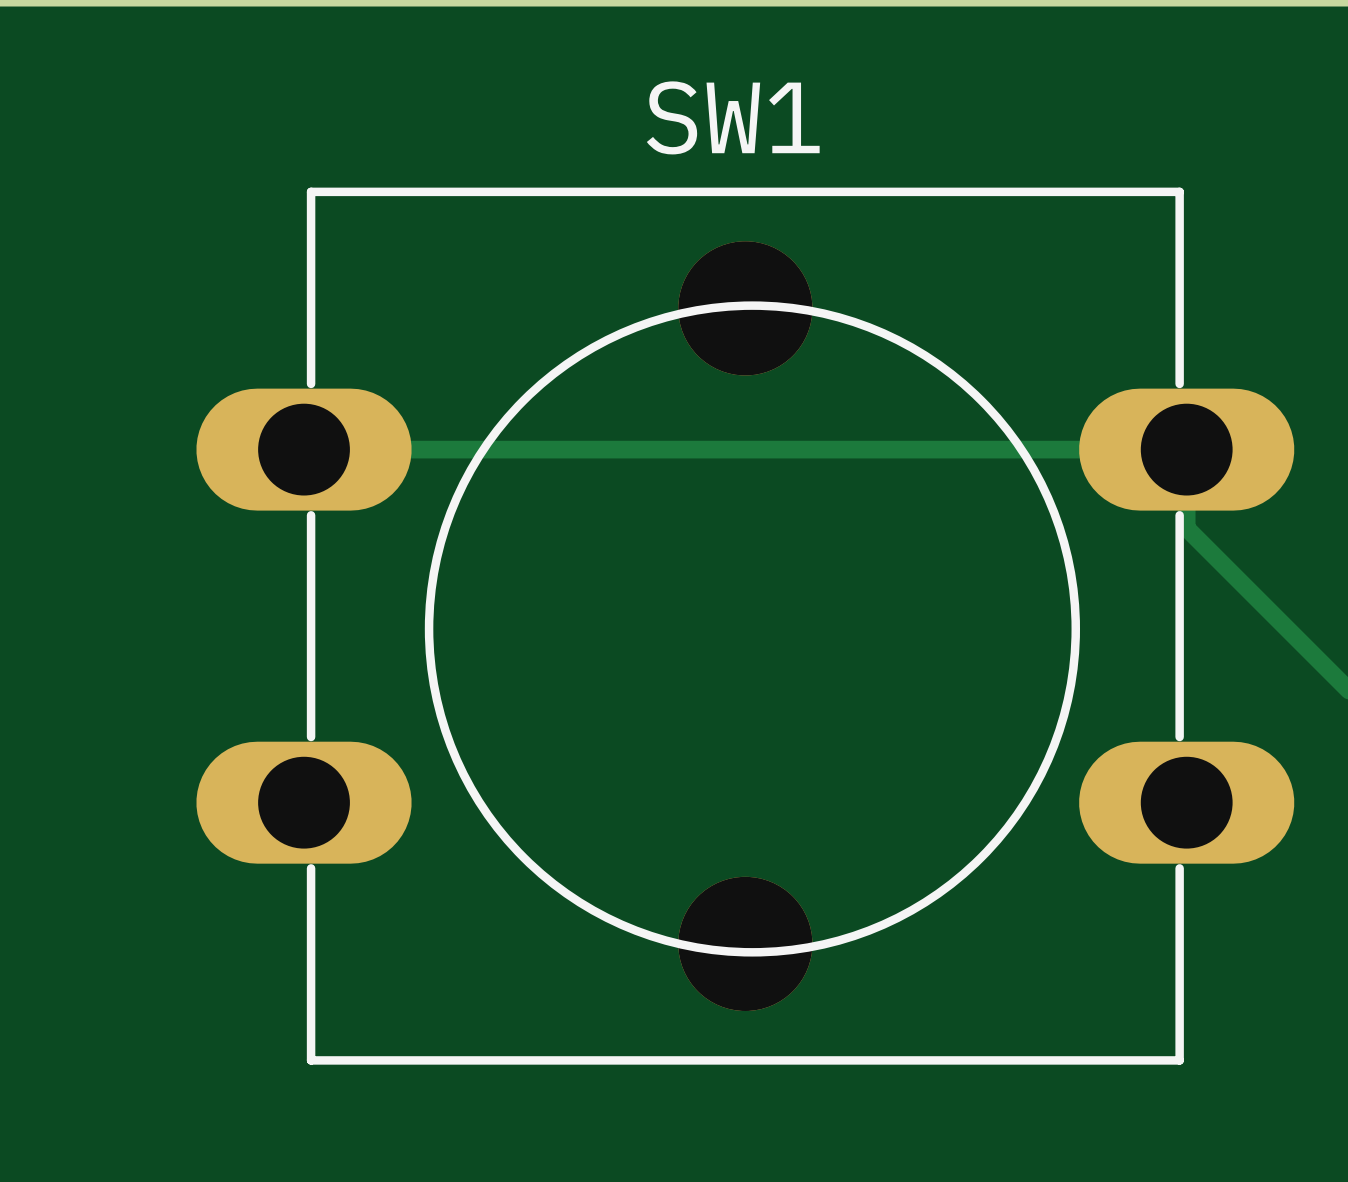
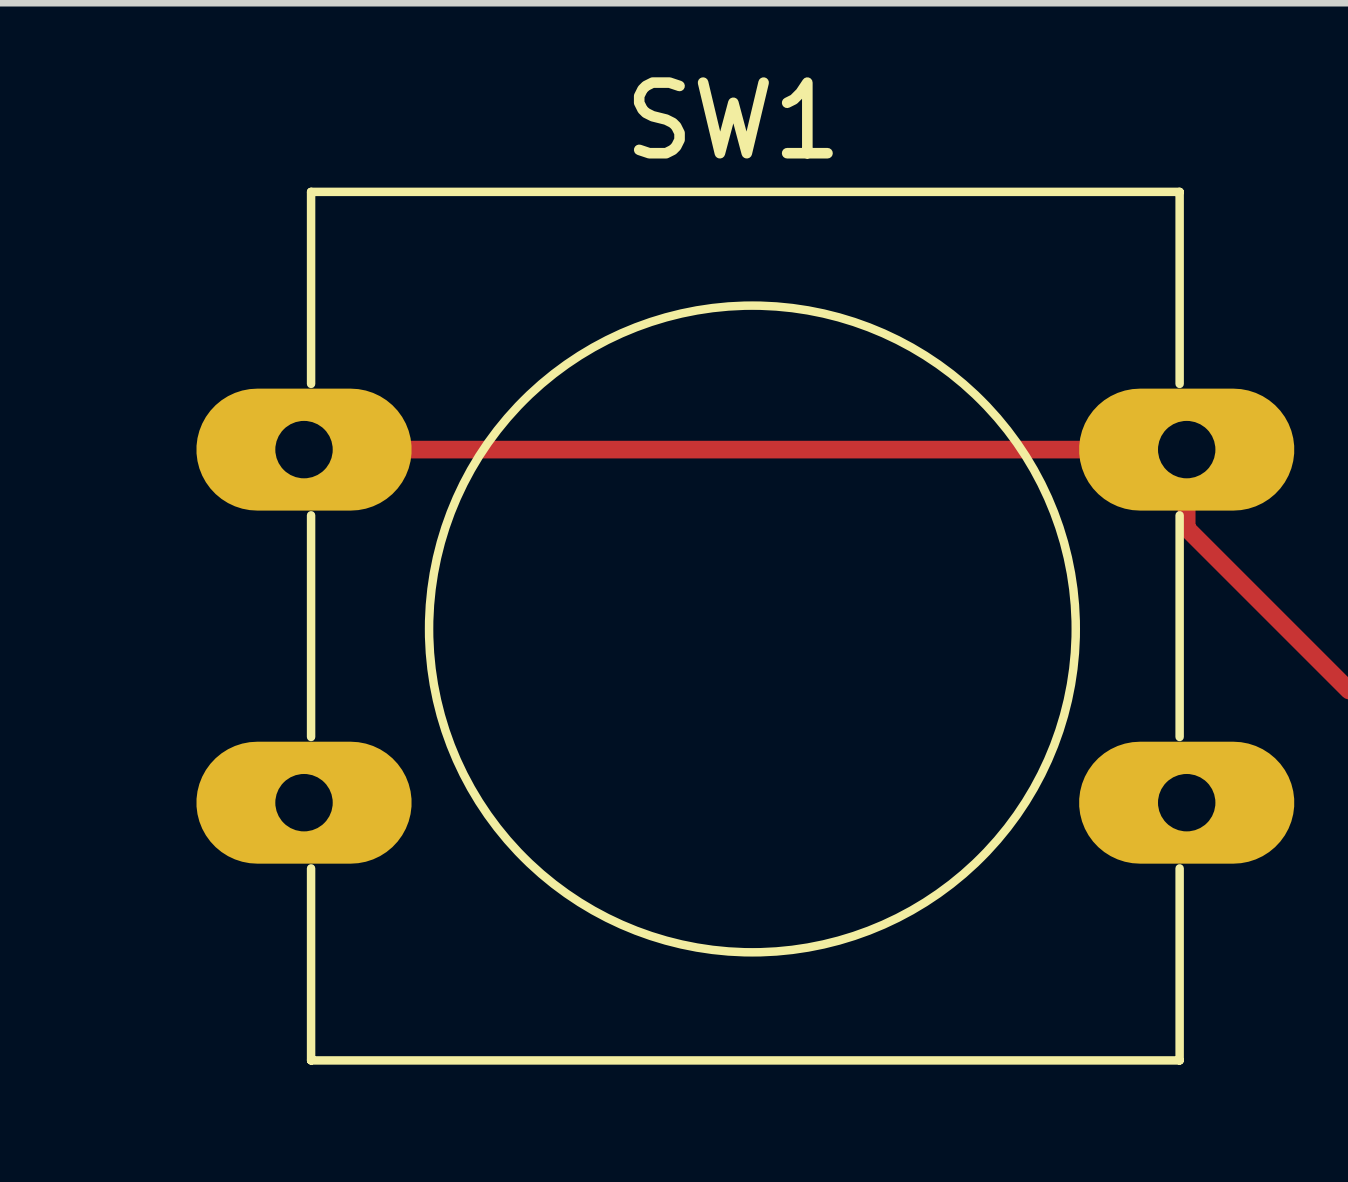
SW1 footprint: [196, 187, 1295, 1065] -> [196, 187, 1295, 1065]

